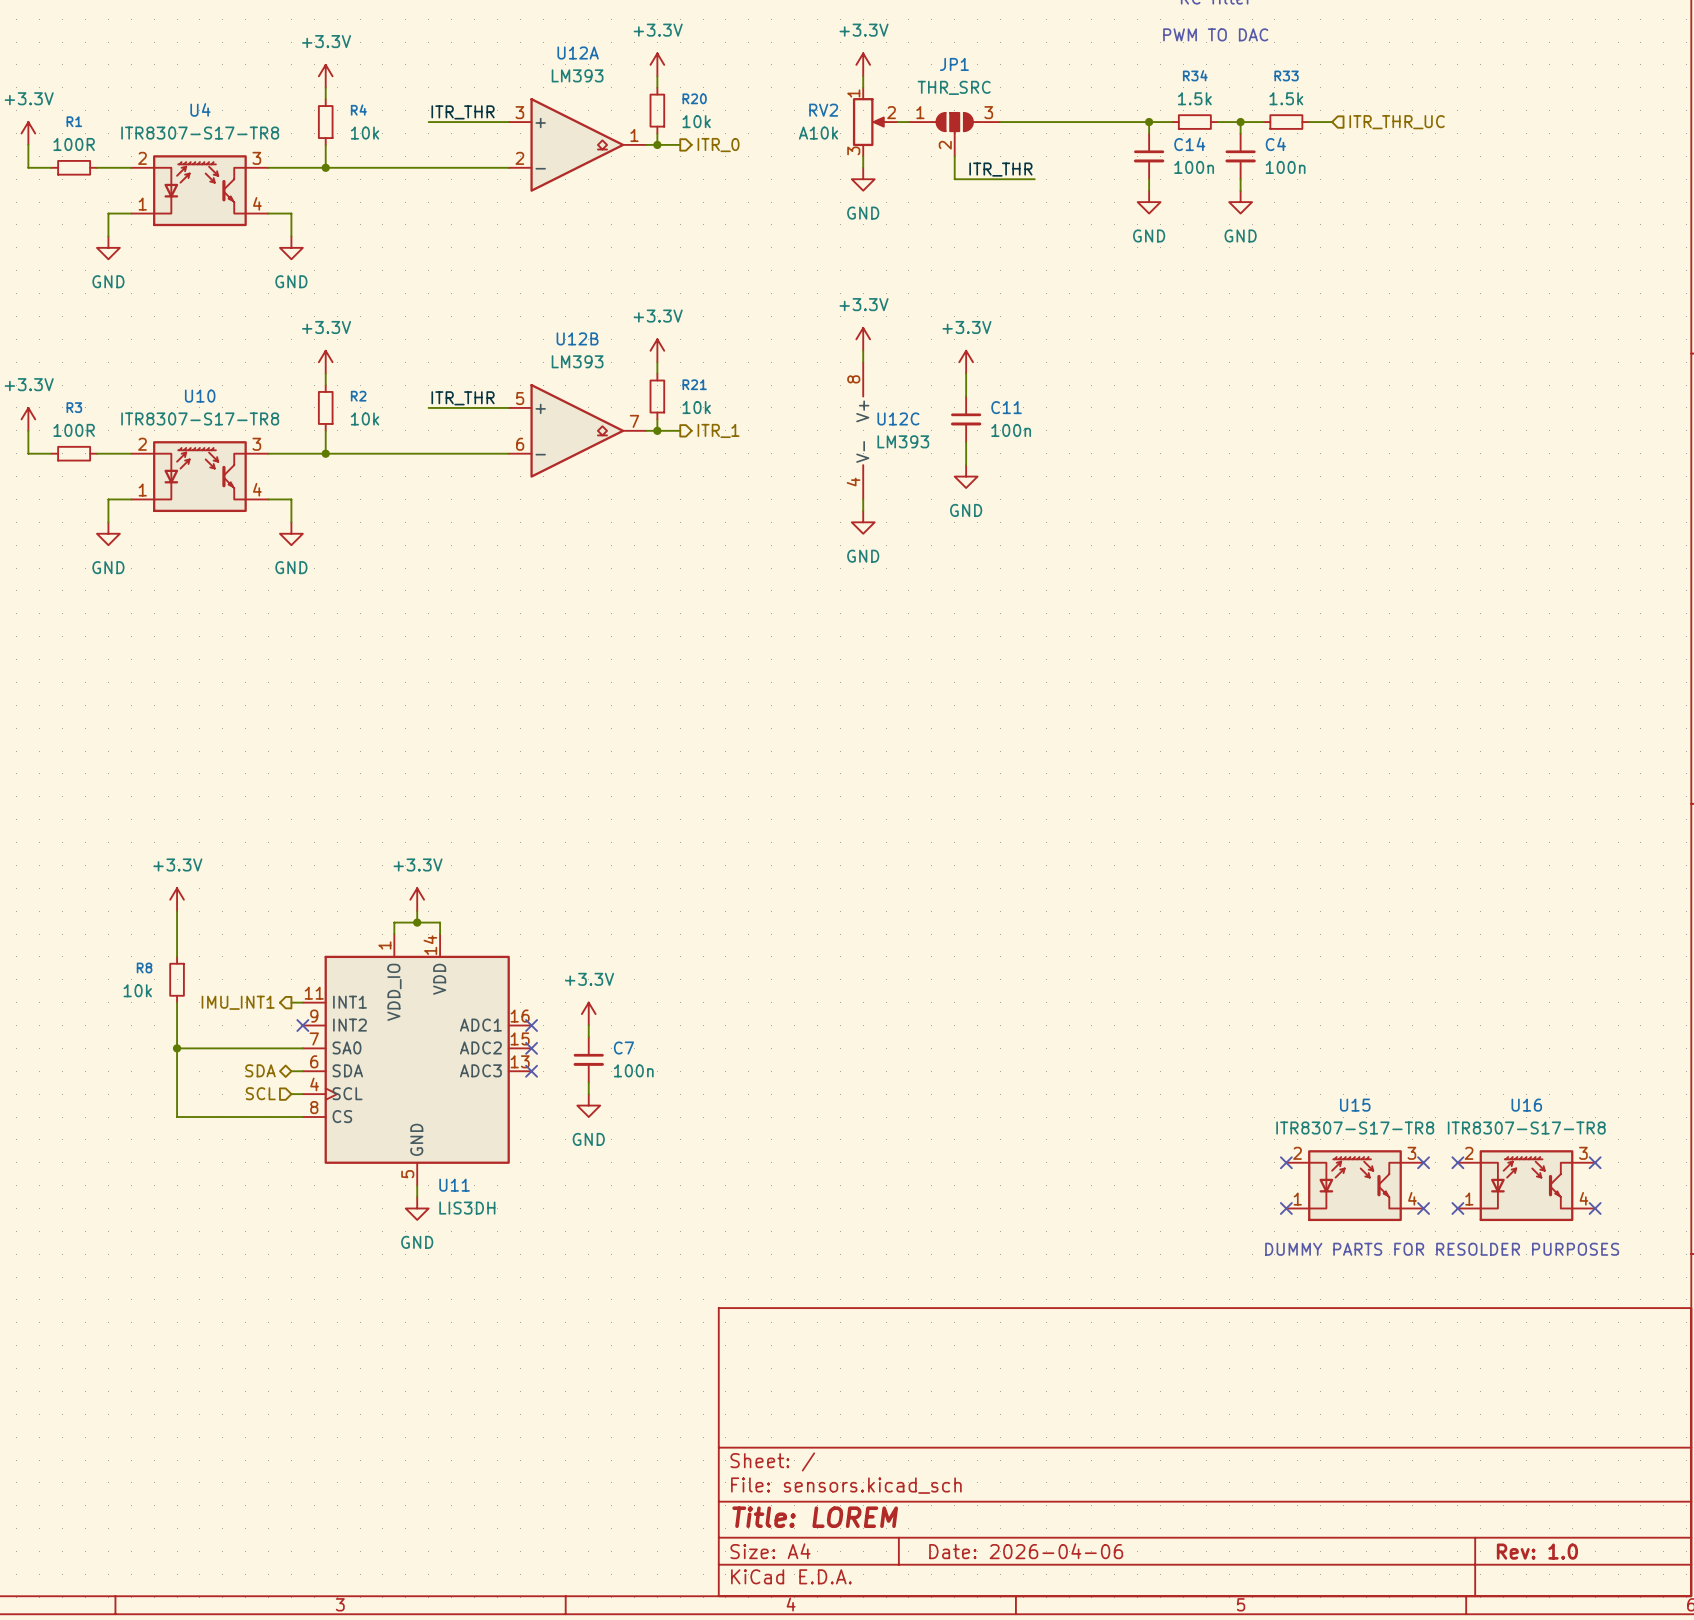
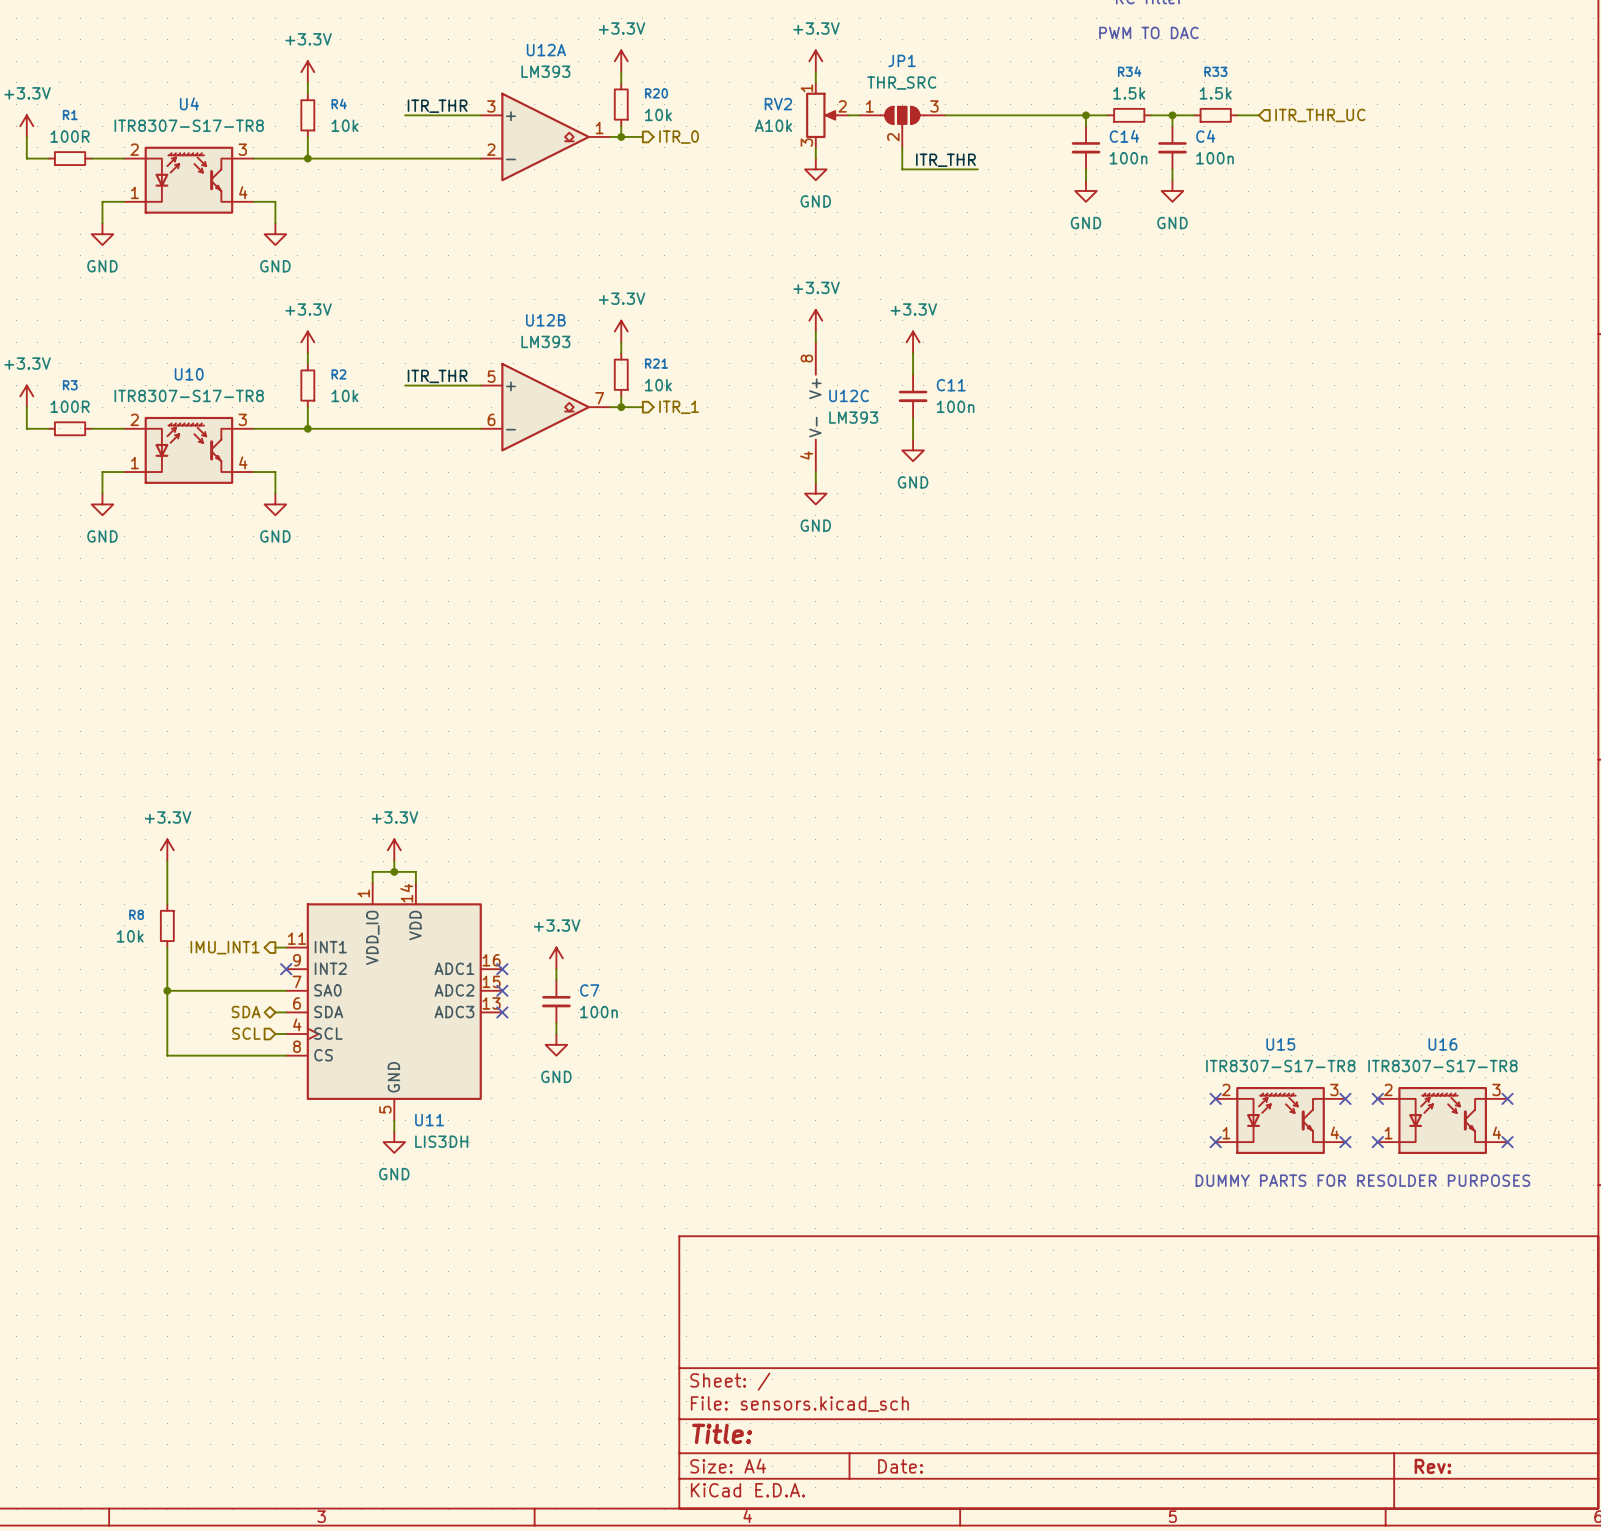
title block: Title: LOREM (815, 1517) -> Title: (722, 1433)
title block: Date: 2026-04-06 (1026, 1551) -> Date: (900, 1466)
title block: Rev: 1.0 (1537, 1551) -> Rev: (1432, 1466)

